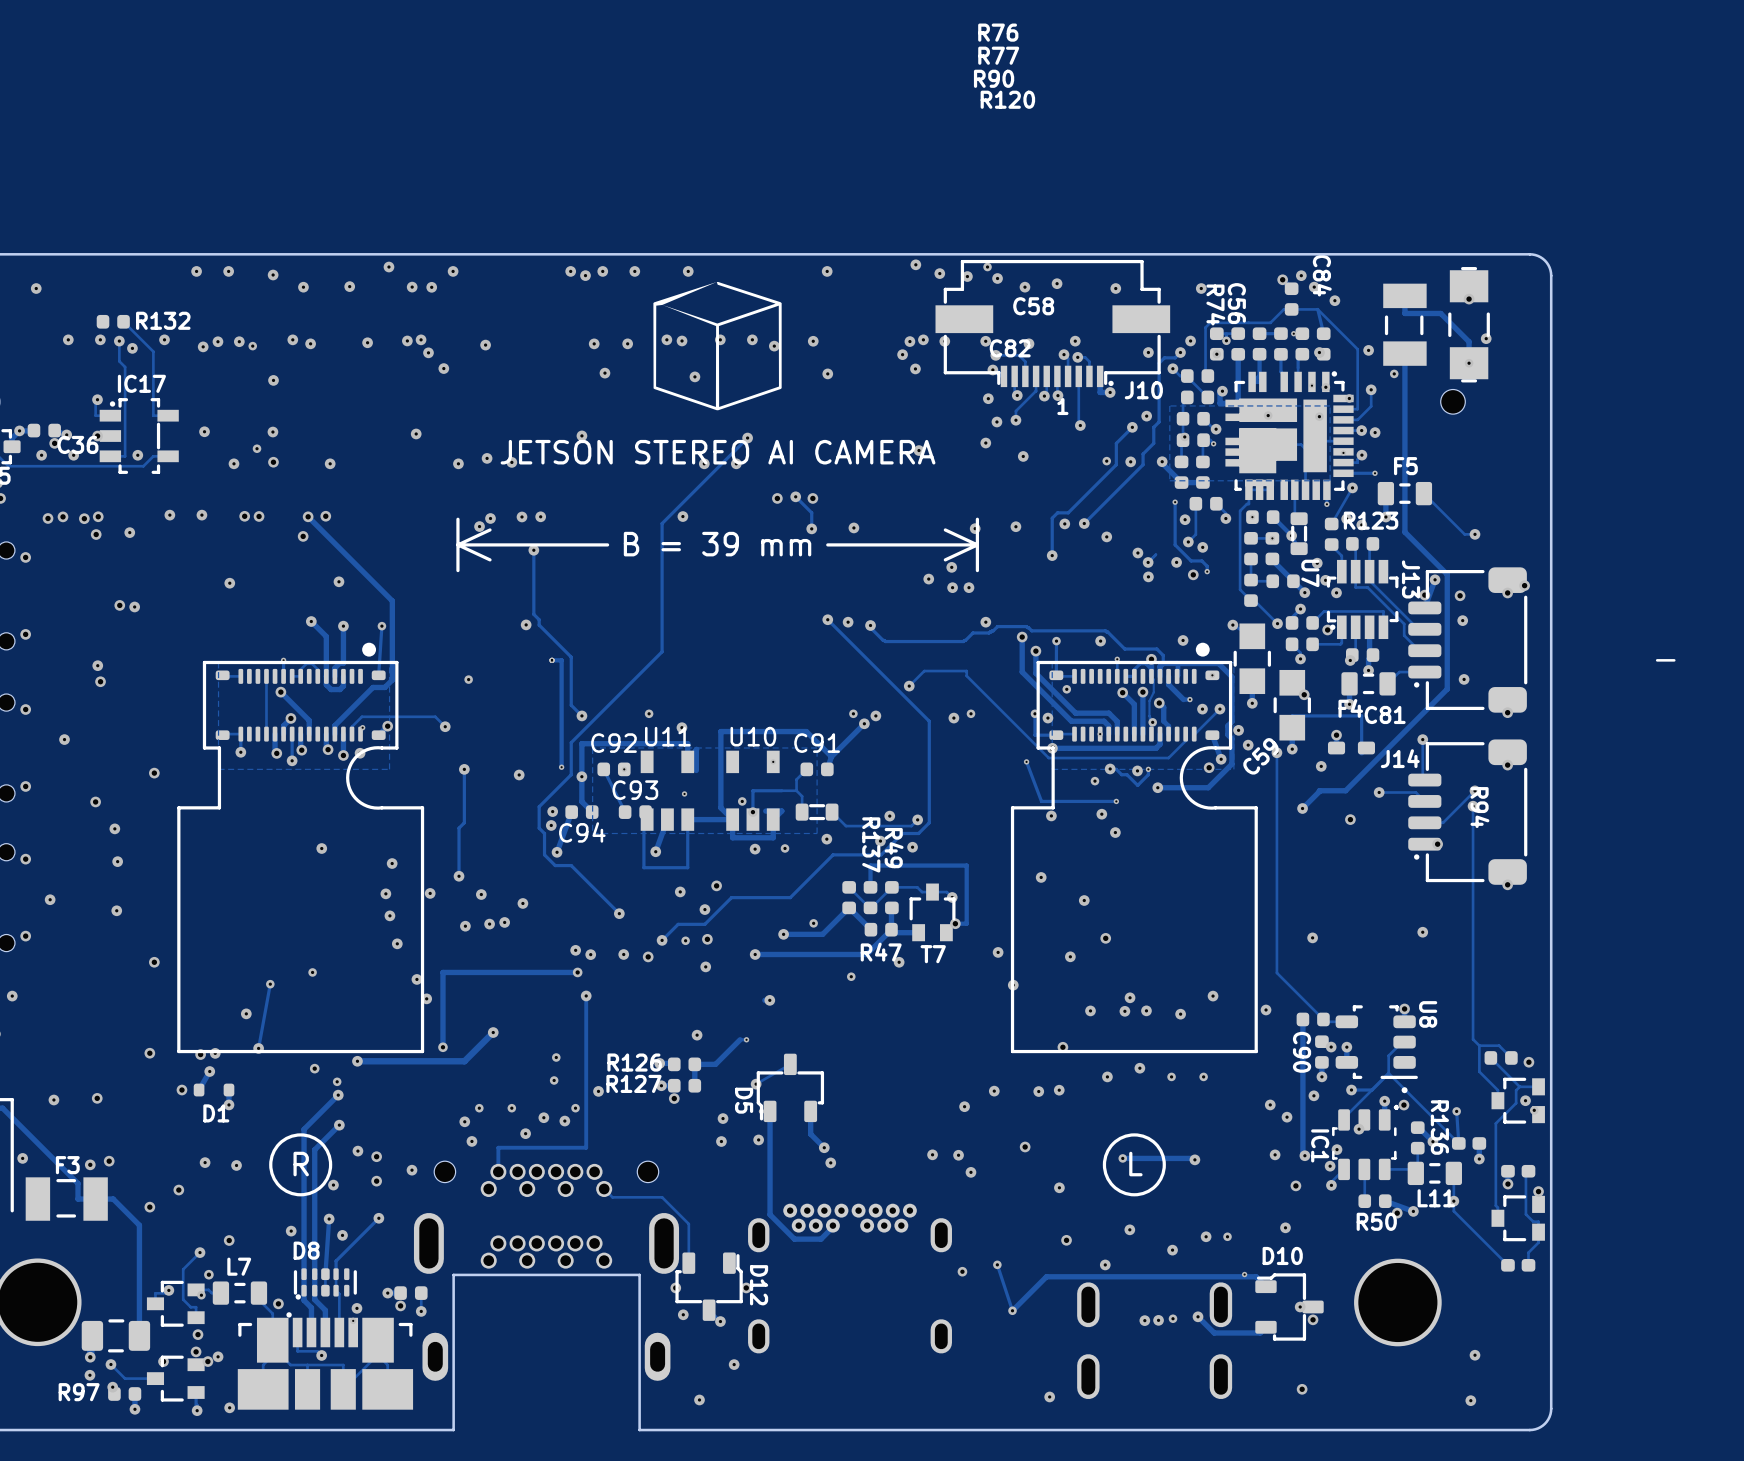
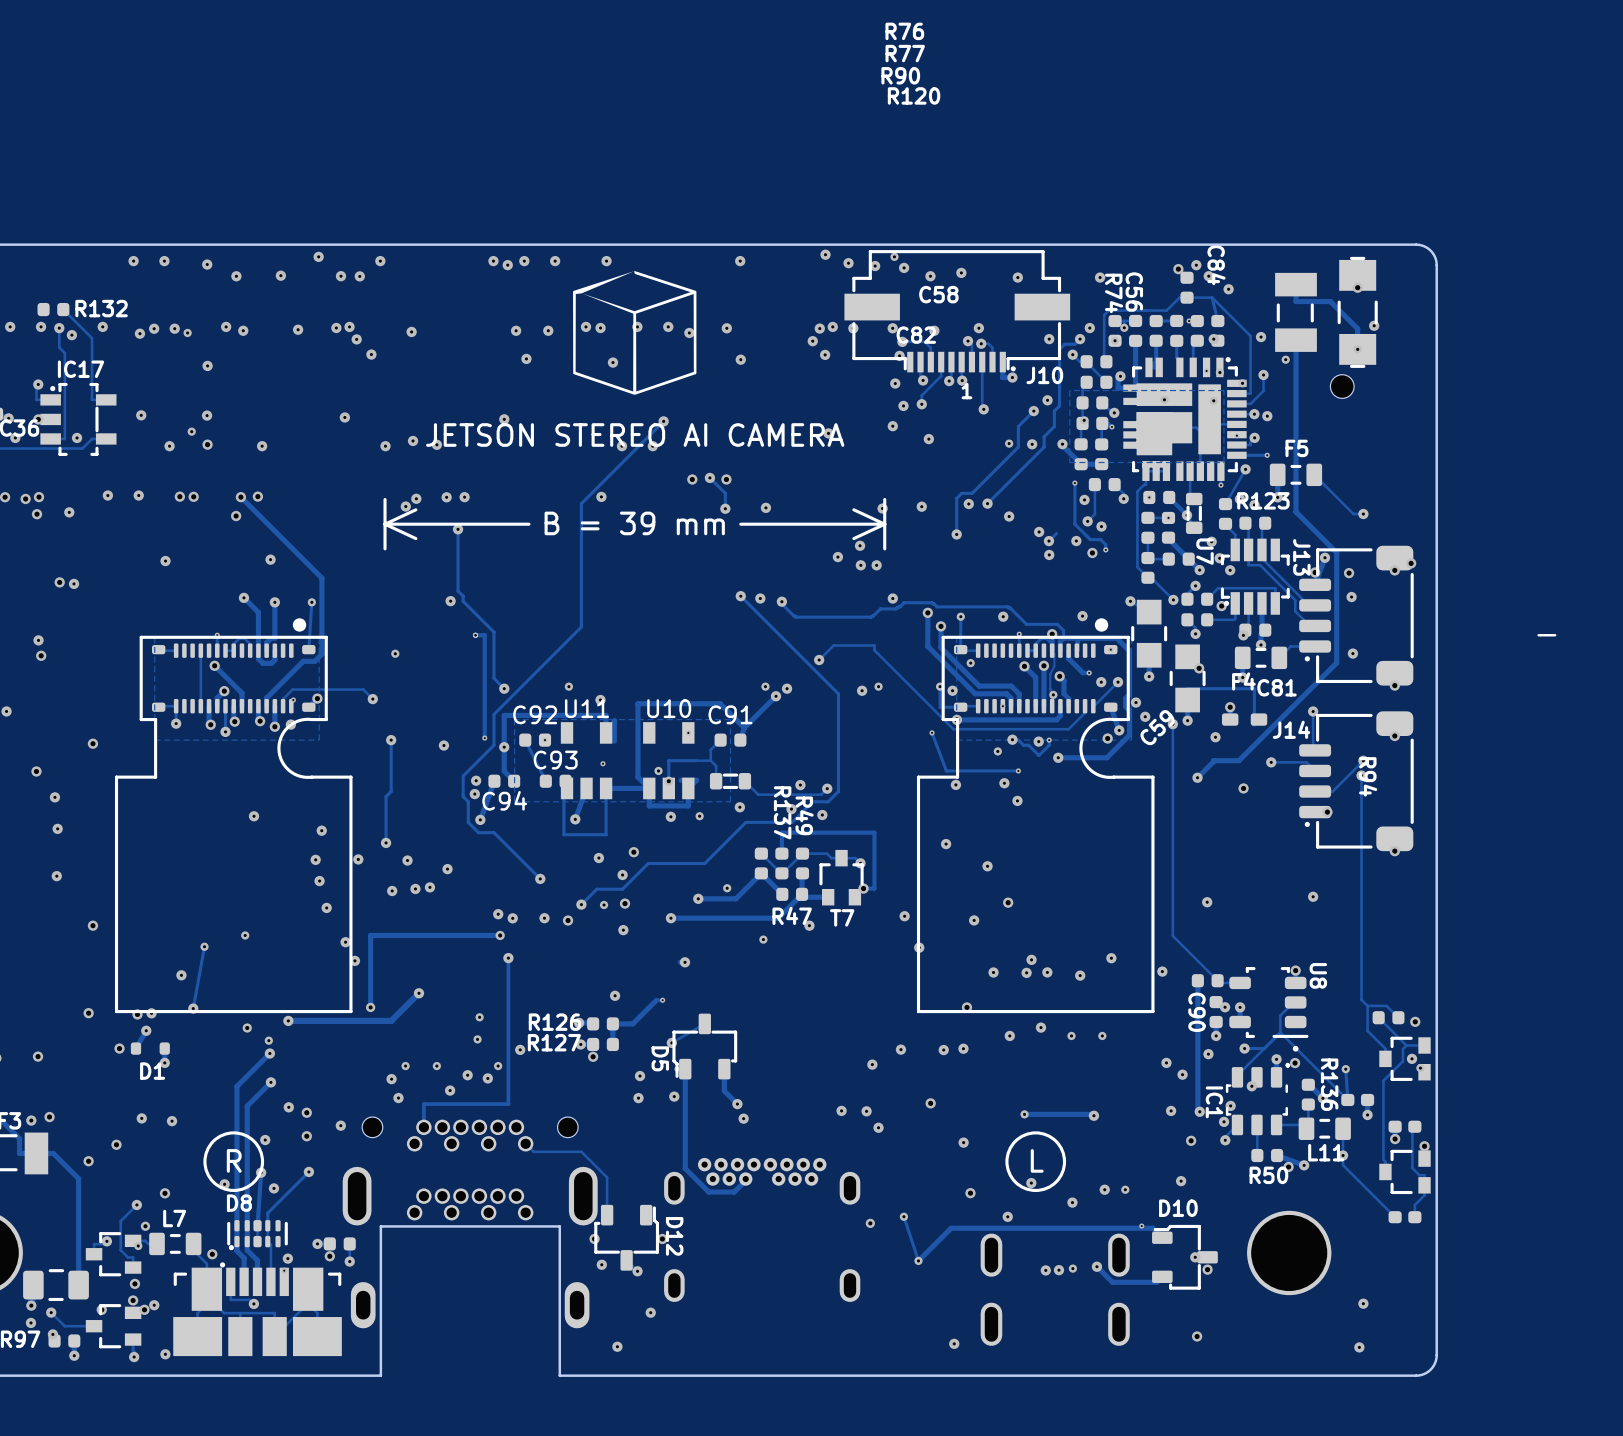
drawing position: (300, 1164) -> (233, 1161)
text position: R (301, 1164) -> R (234, 1160)
drawing position: (1134, 1164) -> (1035, 1161)
text position: L (1135, 1164) -> L (1037, 1160)

